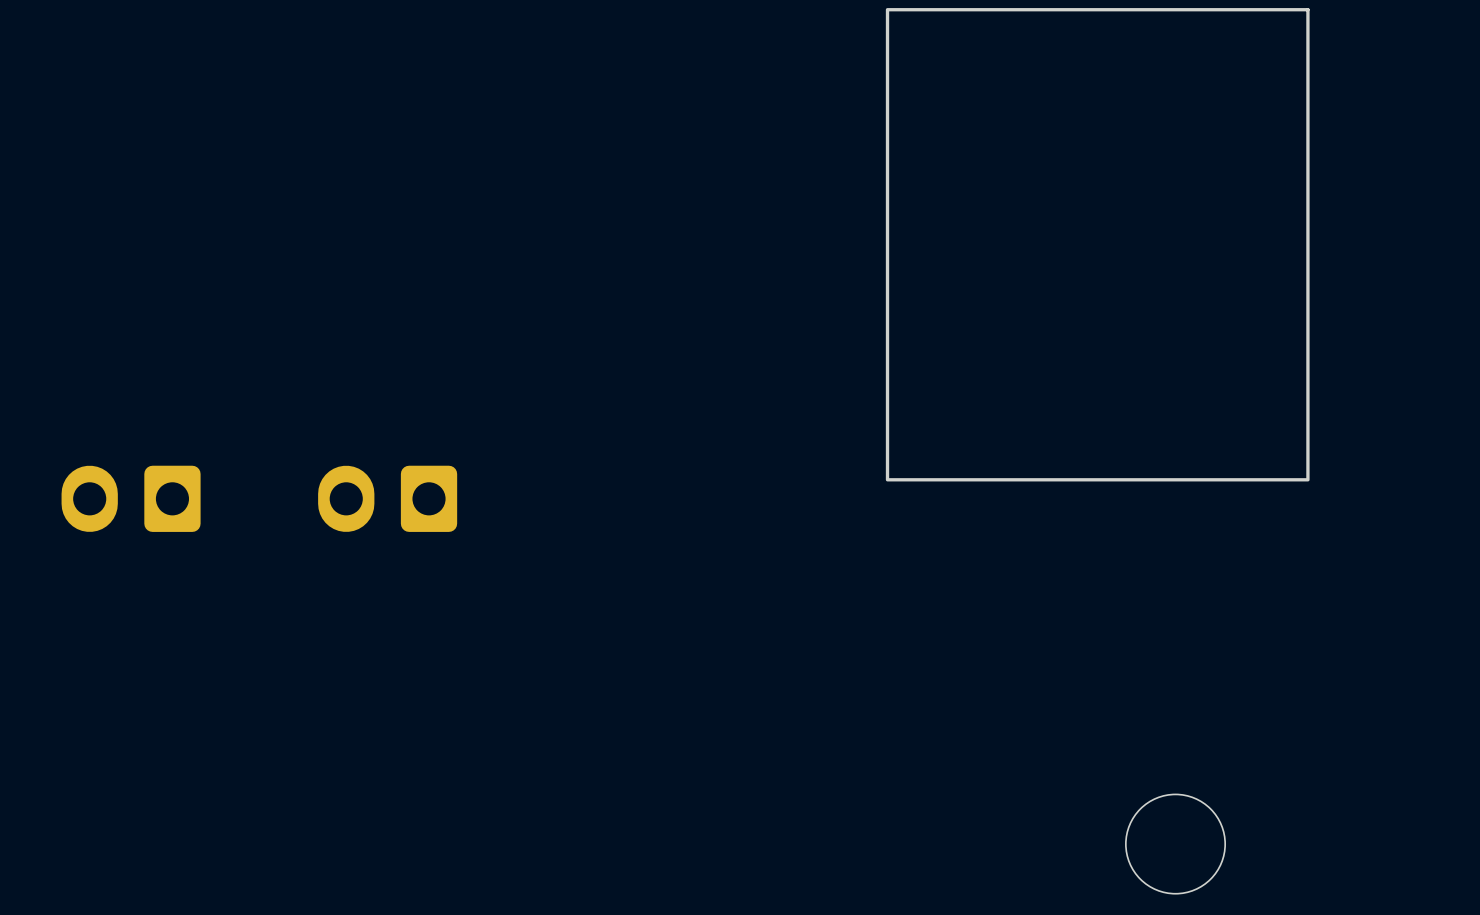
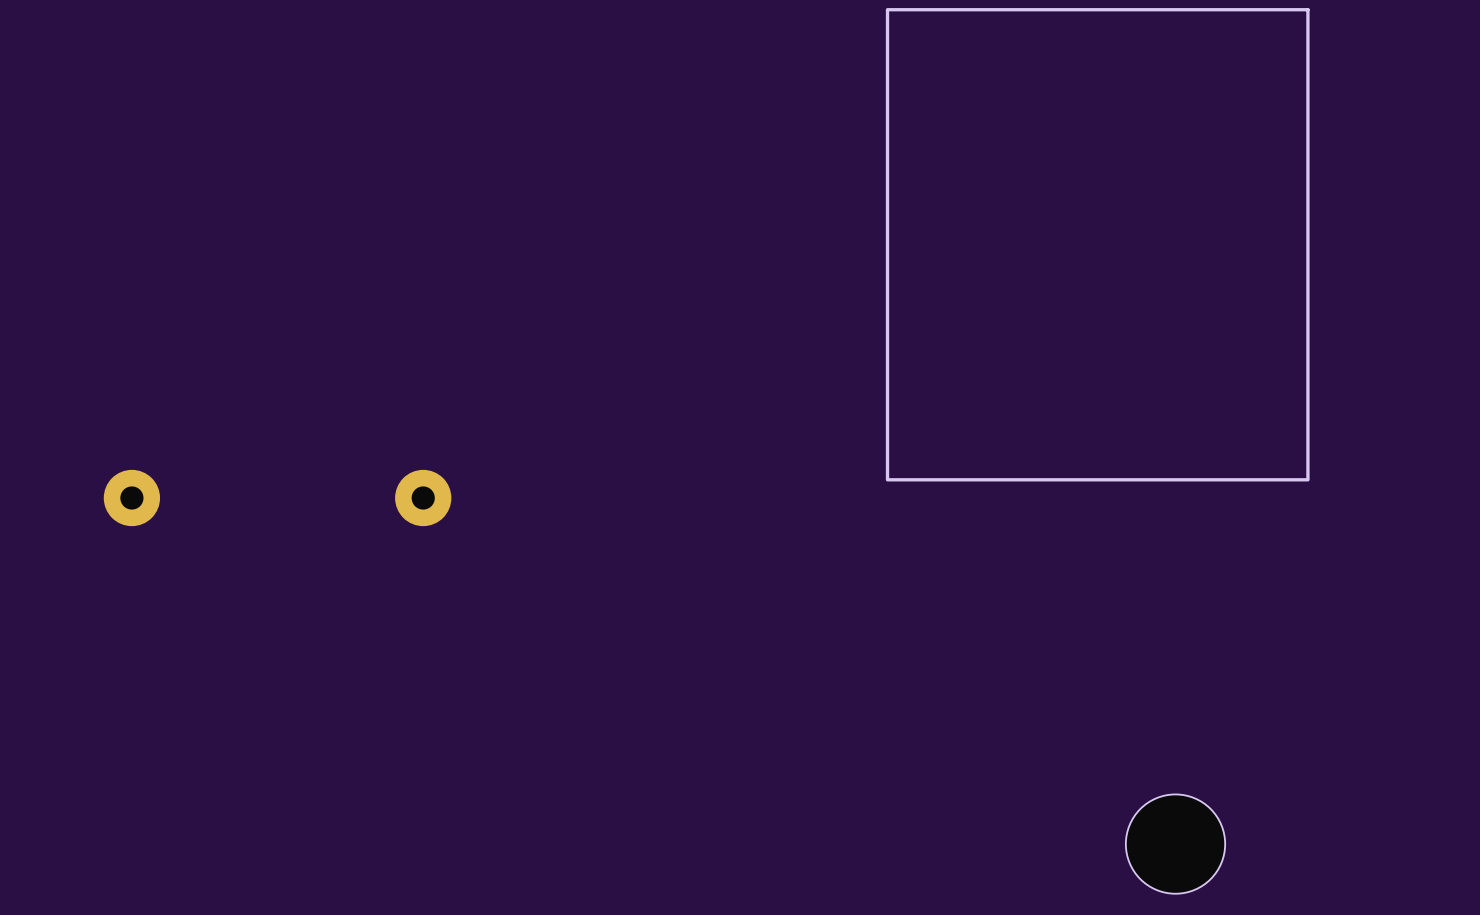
part footprint: [61, 465, 201, 532] -> [103, 469, 161, 527]
part: (387, 498) -> none
part: none -> (423, 498)

